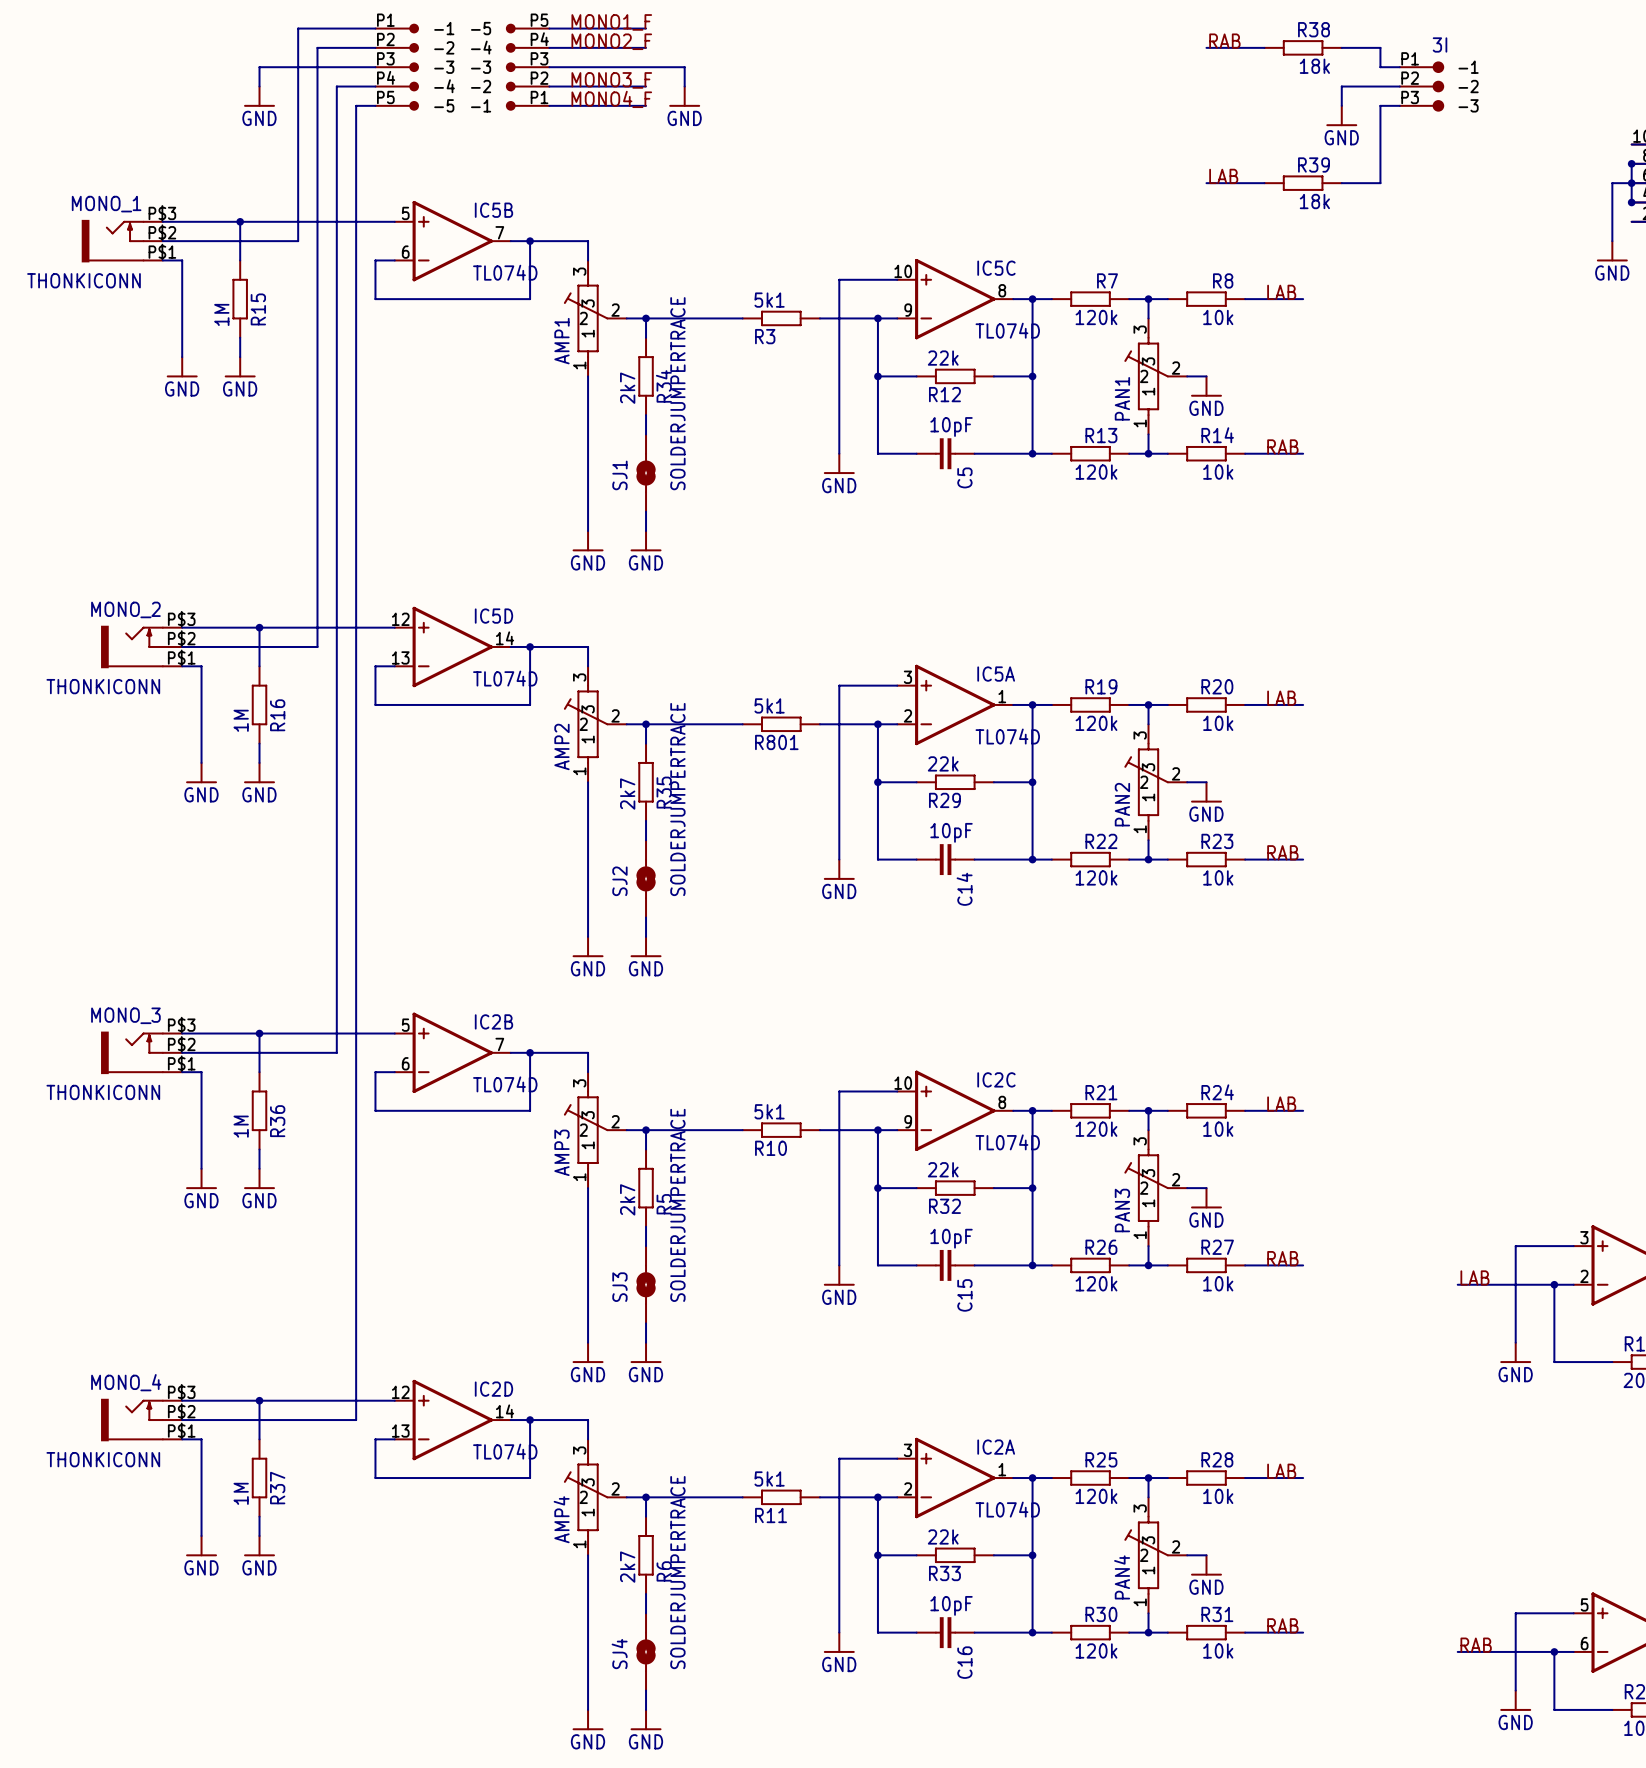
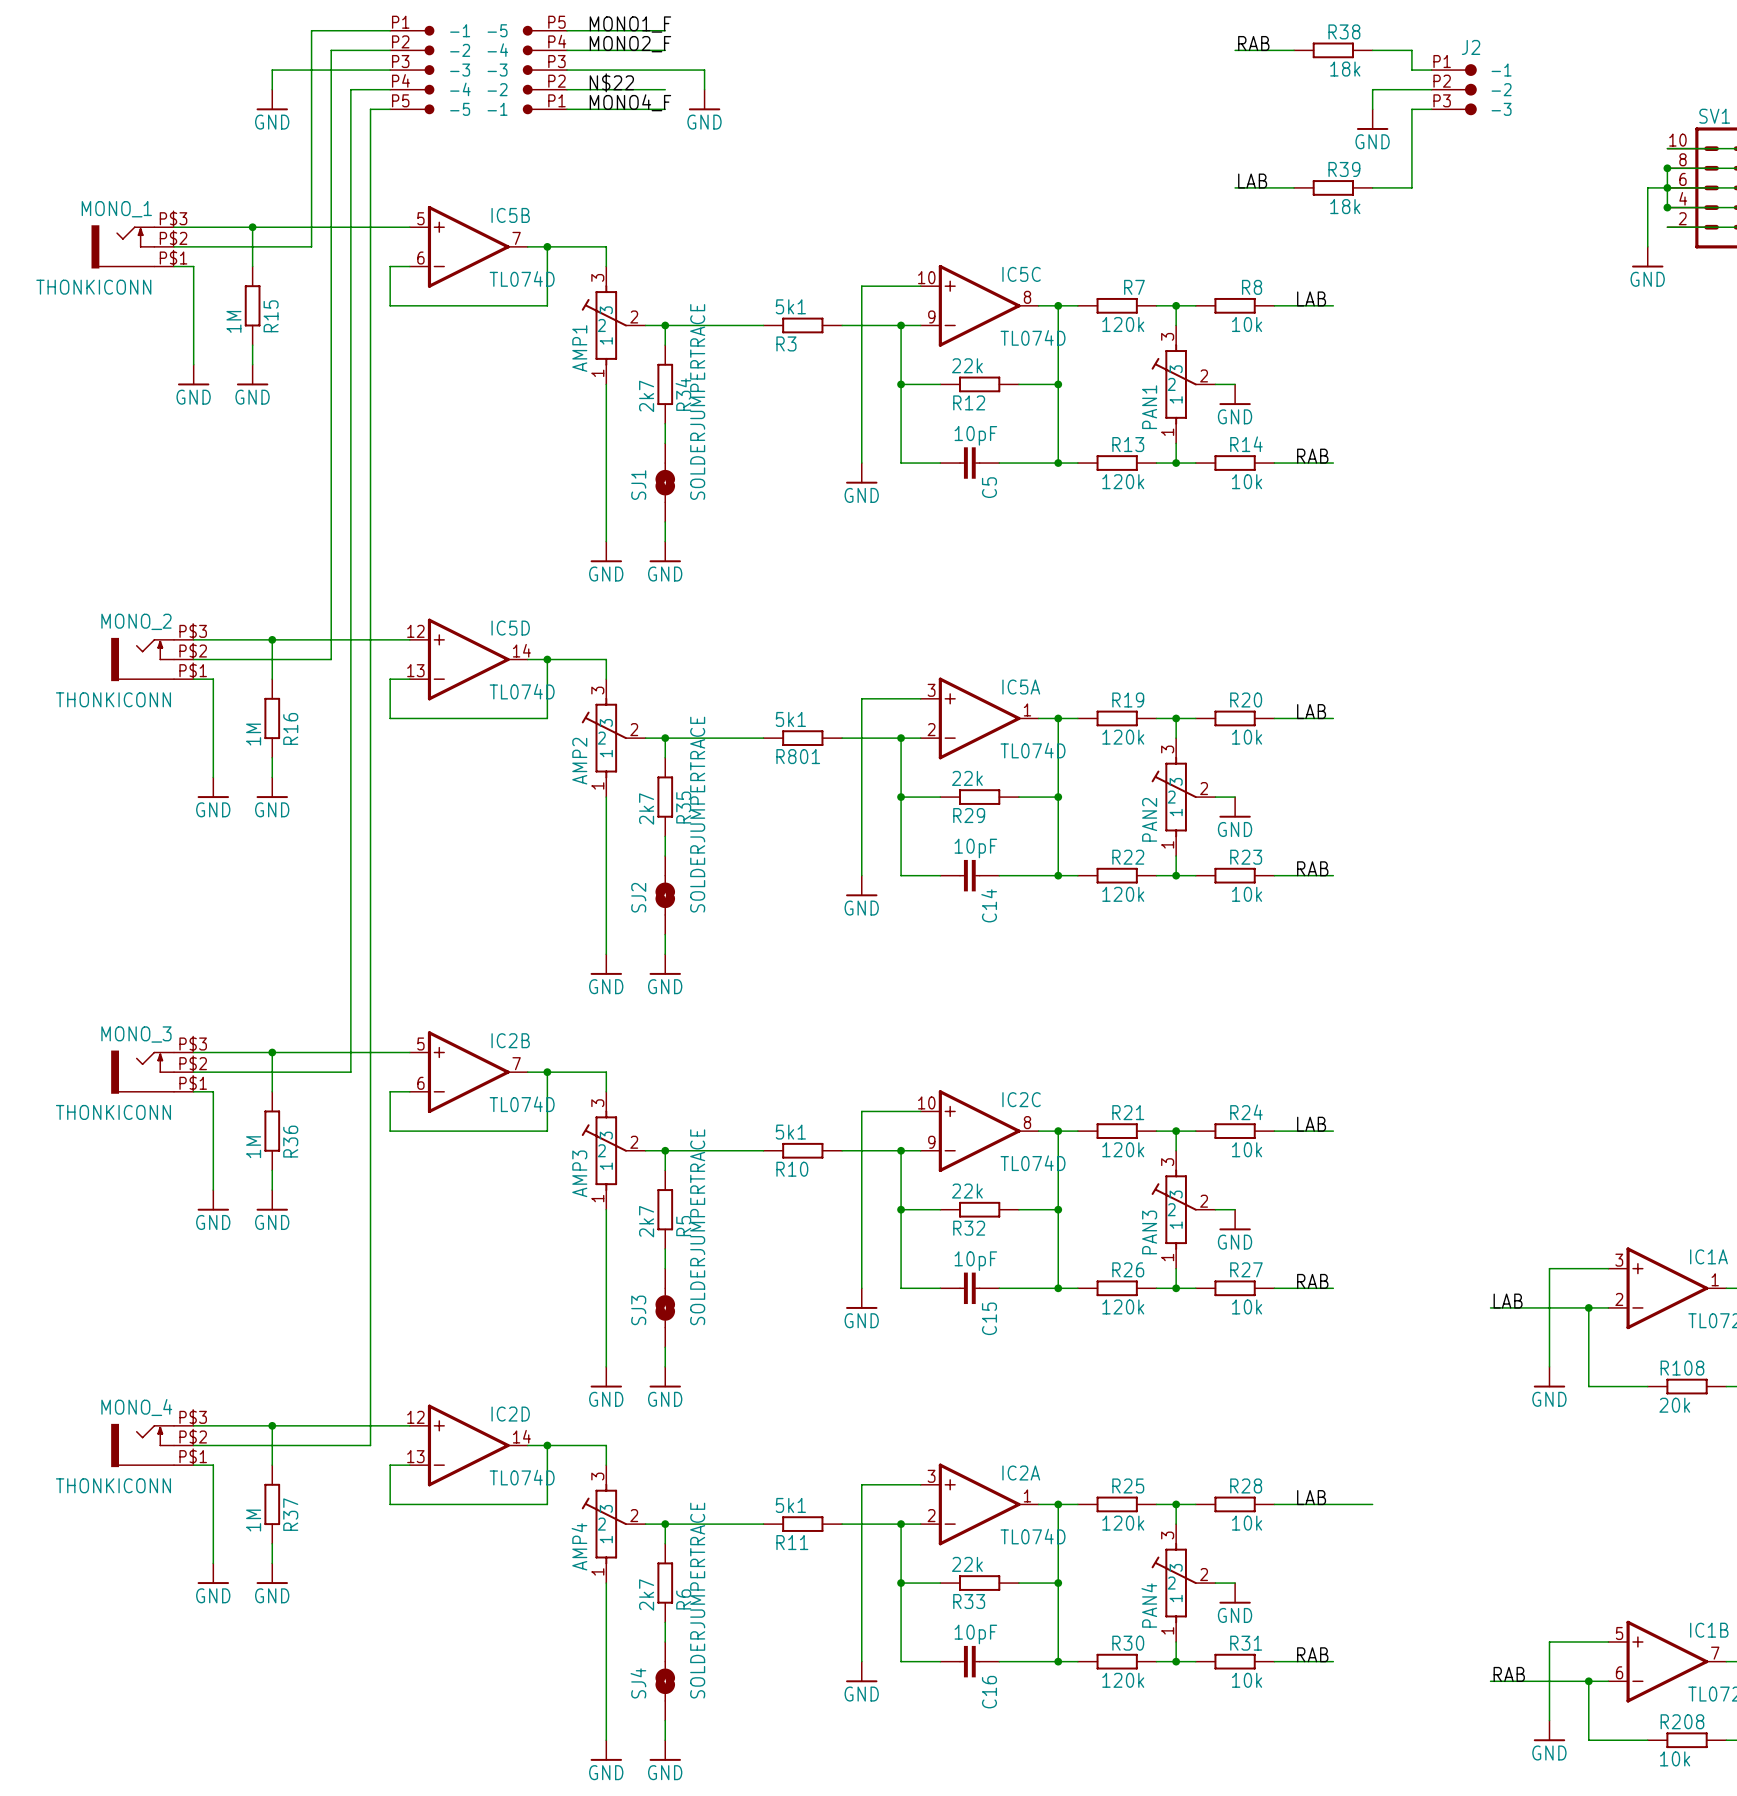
3I name: 3I (1440, 44) -> J2 (1471, 47)
label: MONO3_F (611, 80) -> N$22 (611, 82)
wire: none -> (1333, 1504) (1372, 1504)

